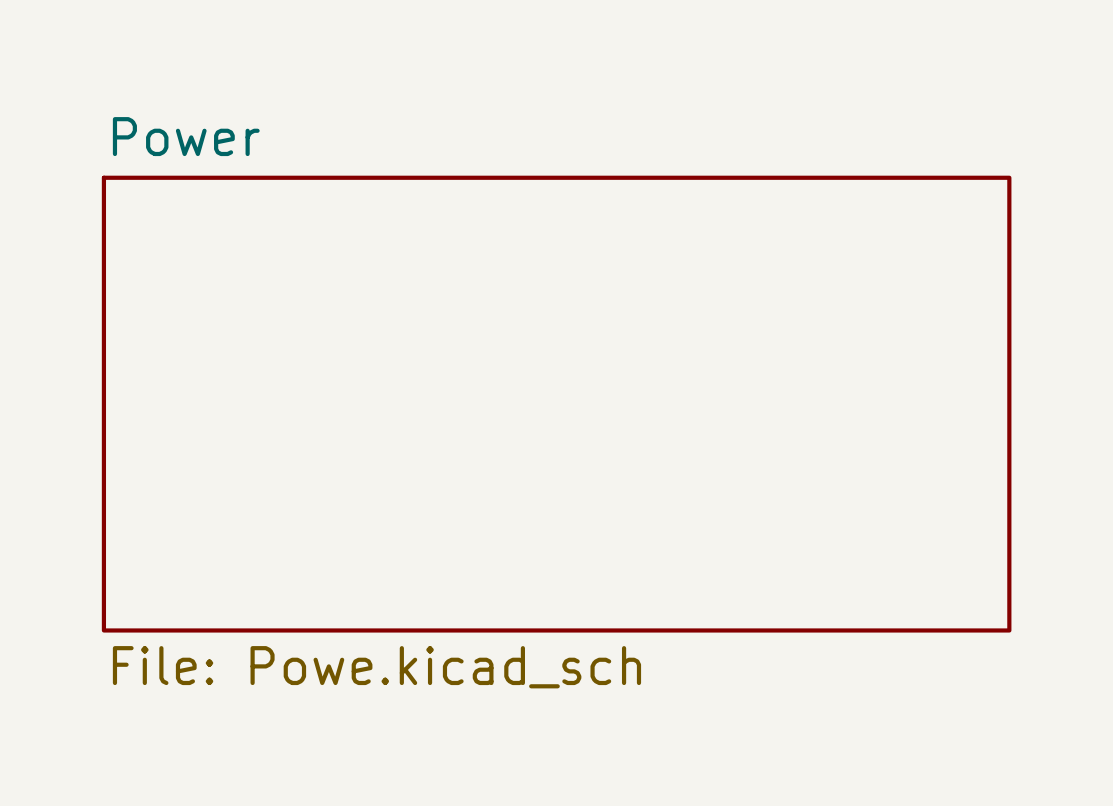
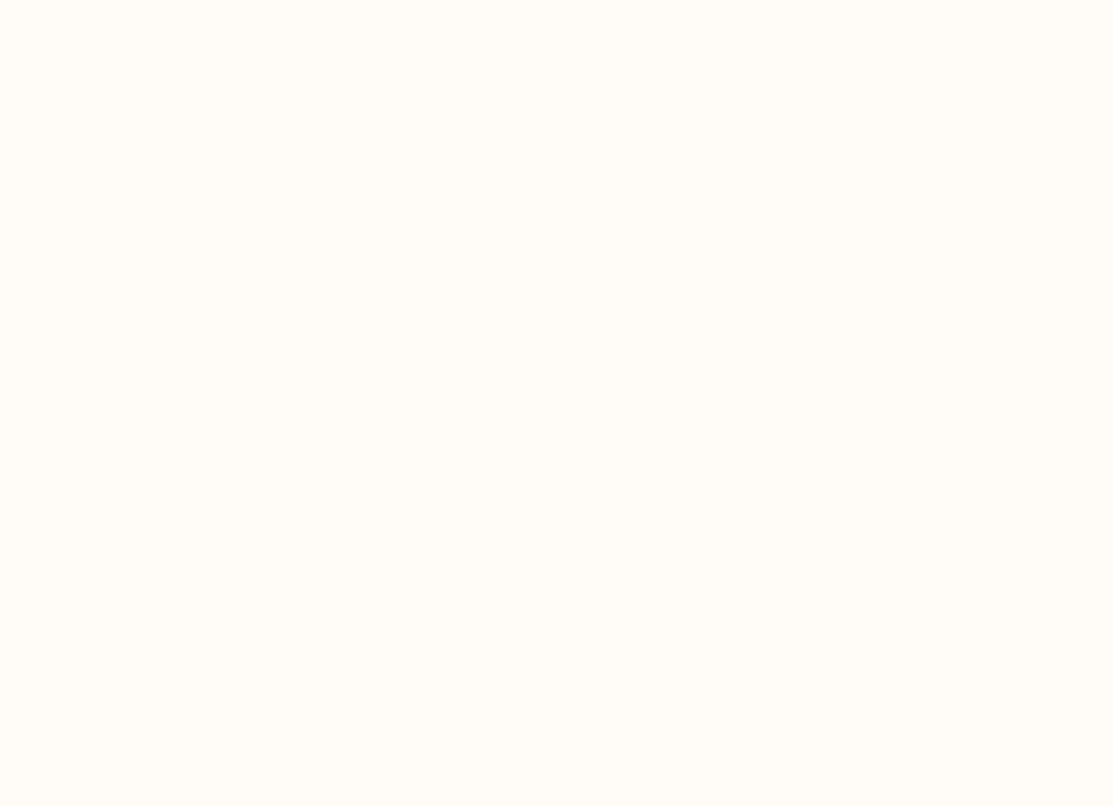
sheet Power: File: Powe.kicad_sch (556, 404) -> none

